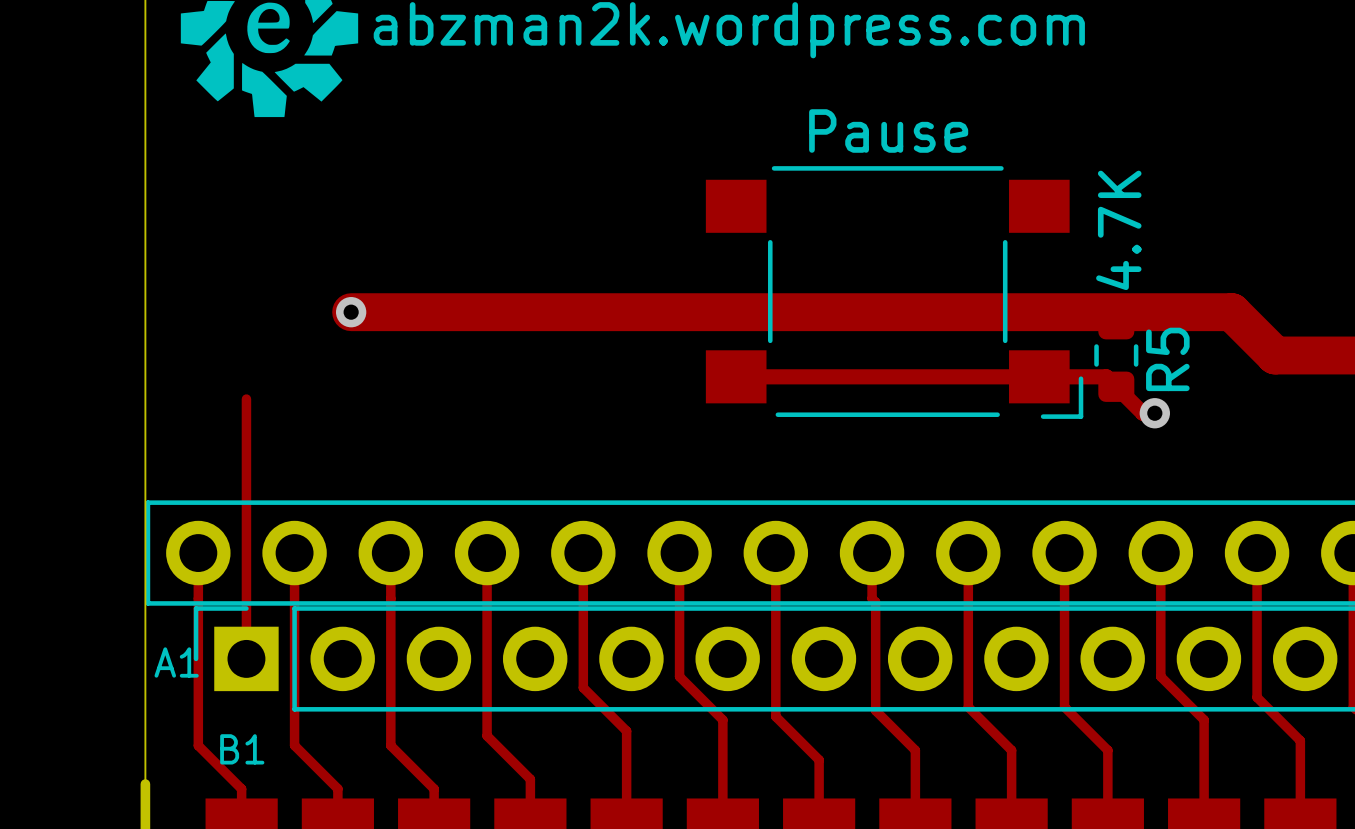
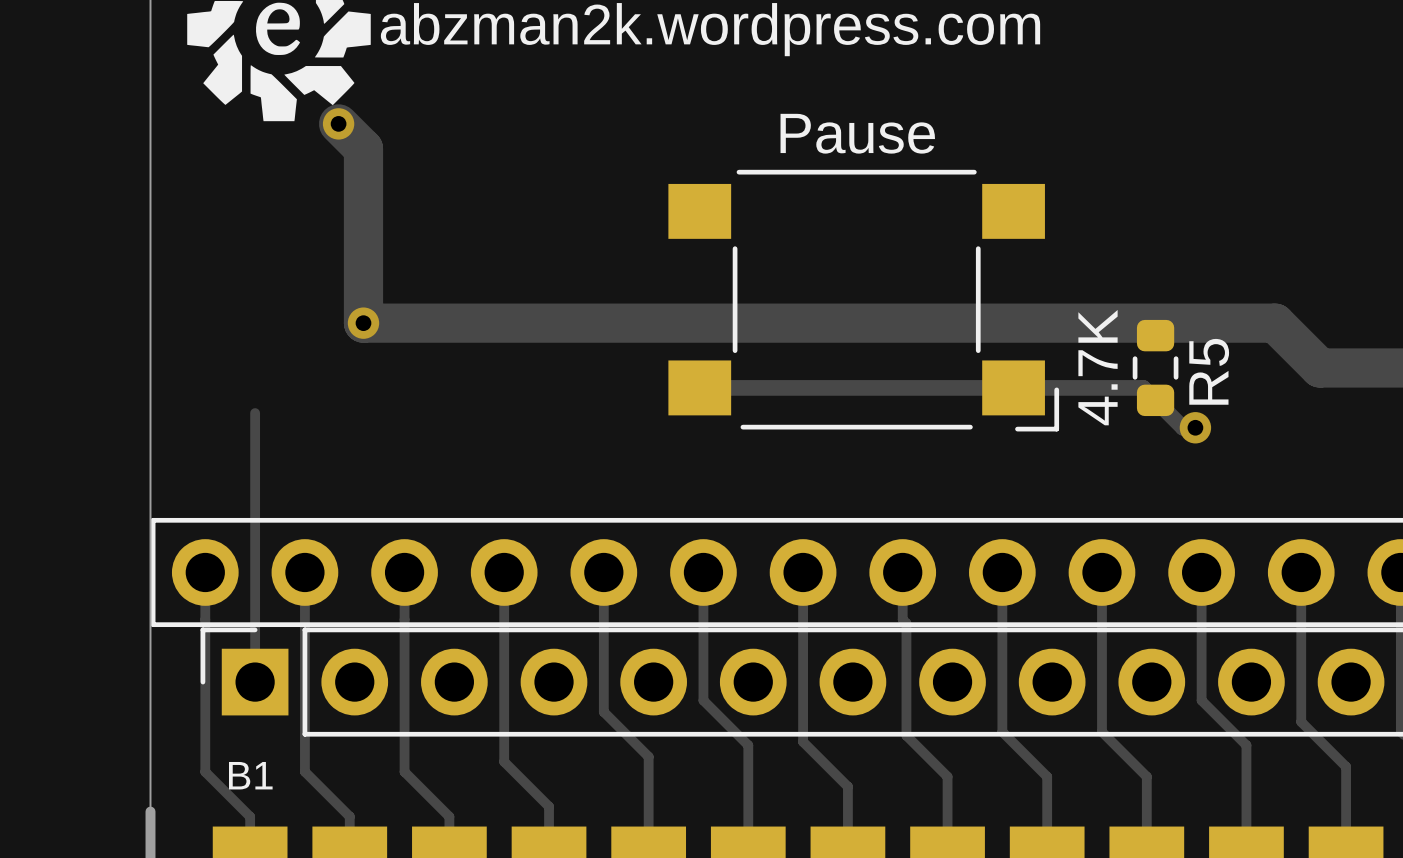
track: none -> (338, 123) (363, 148) (363, 323)
via: none -> (338, 123)
R5 value position: 4.7K (1118, 230) -> 4.7K (1098, 367)
part position: (894, 292) -> (863, 300)
track: (736, 376) (1106, 376) -> (699, 387) (1143, 387) (1145, 390)
text: A1 (176, 662) -> none

